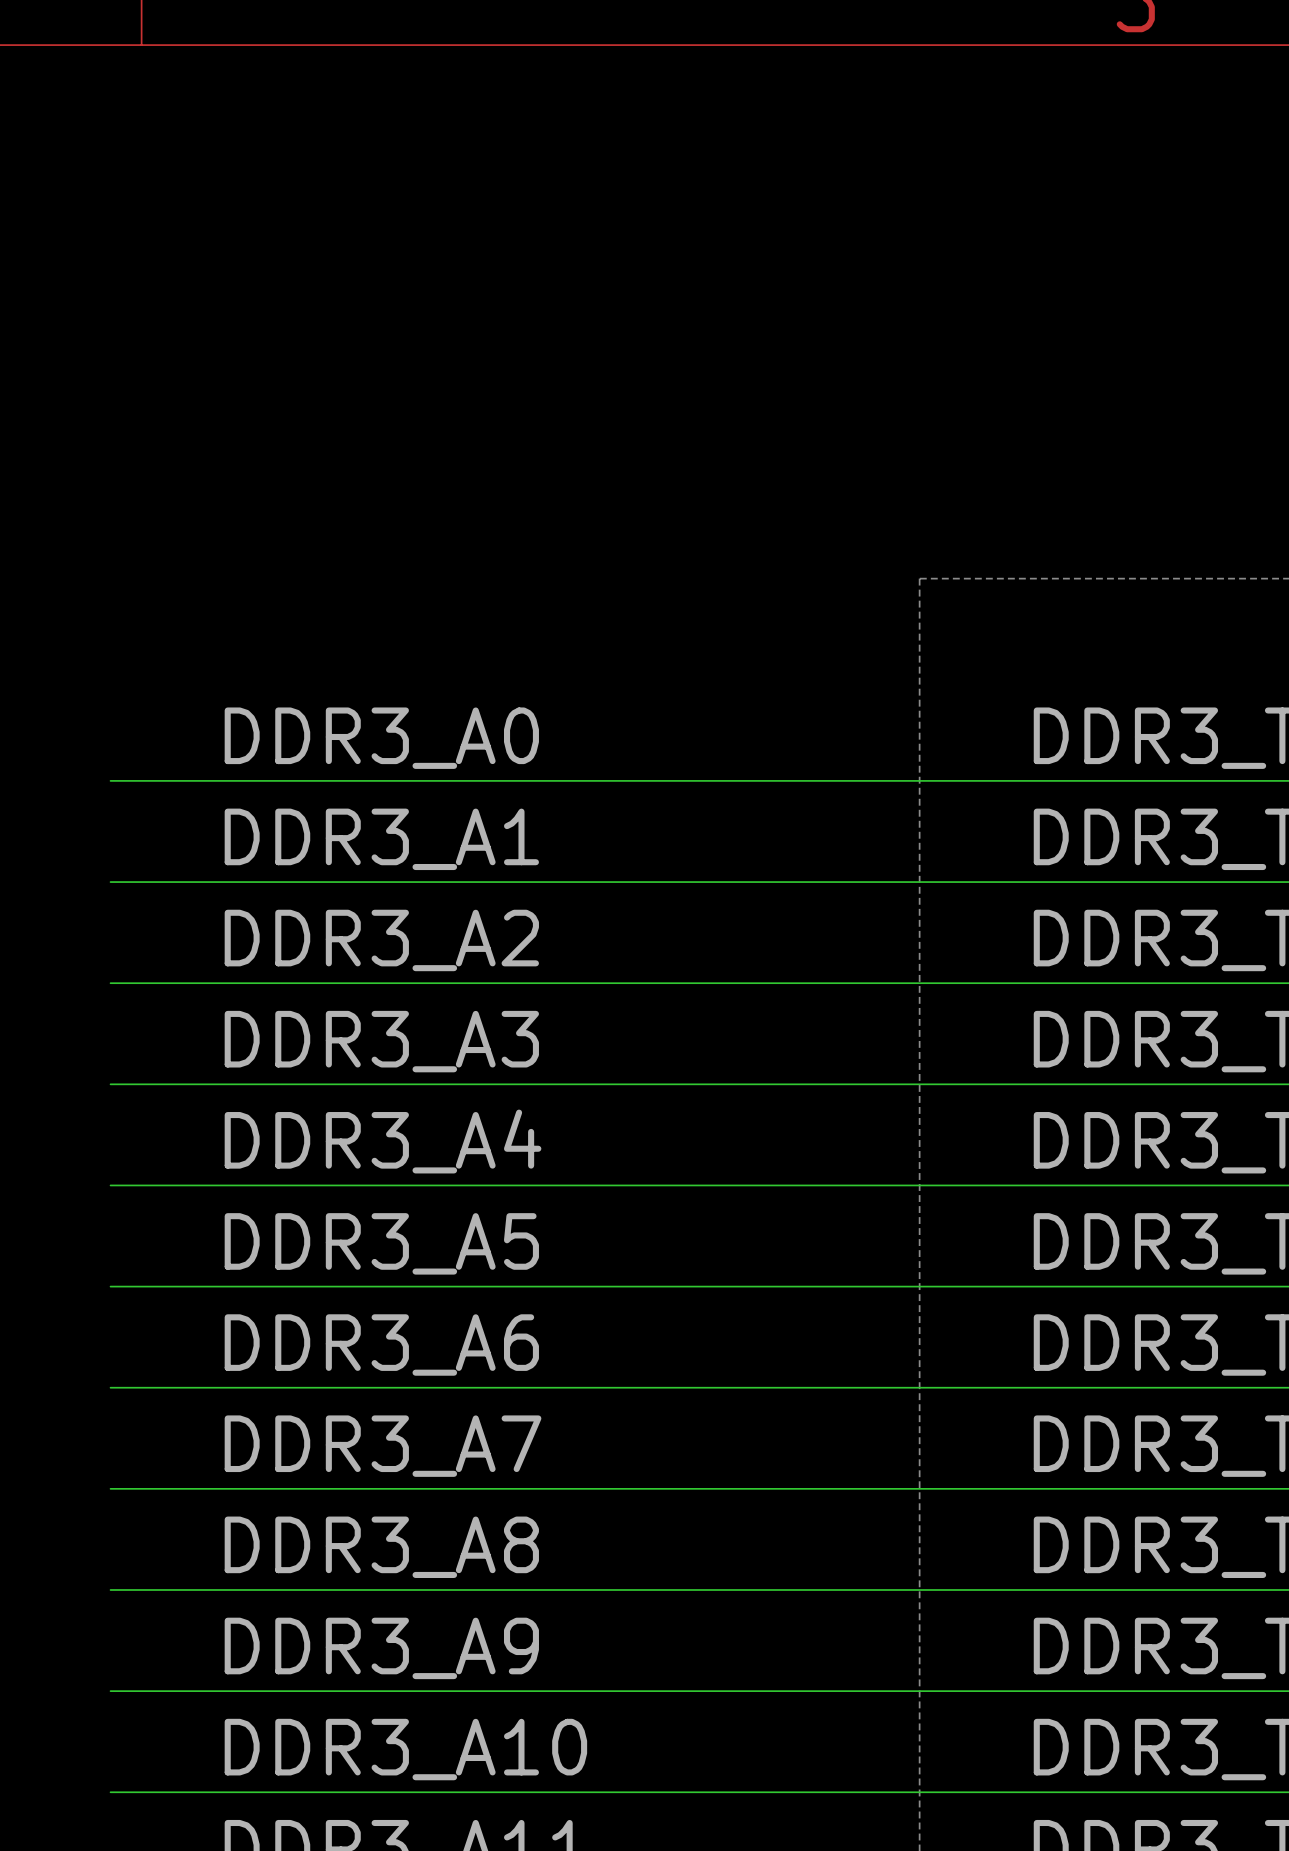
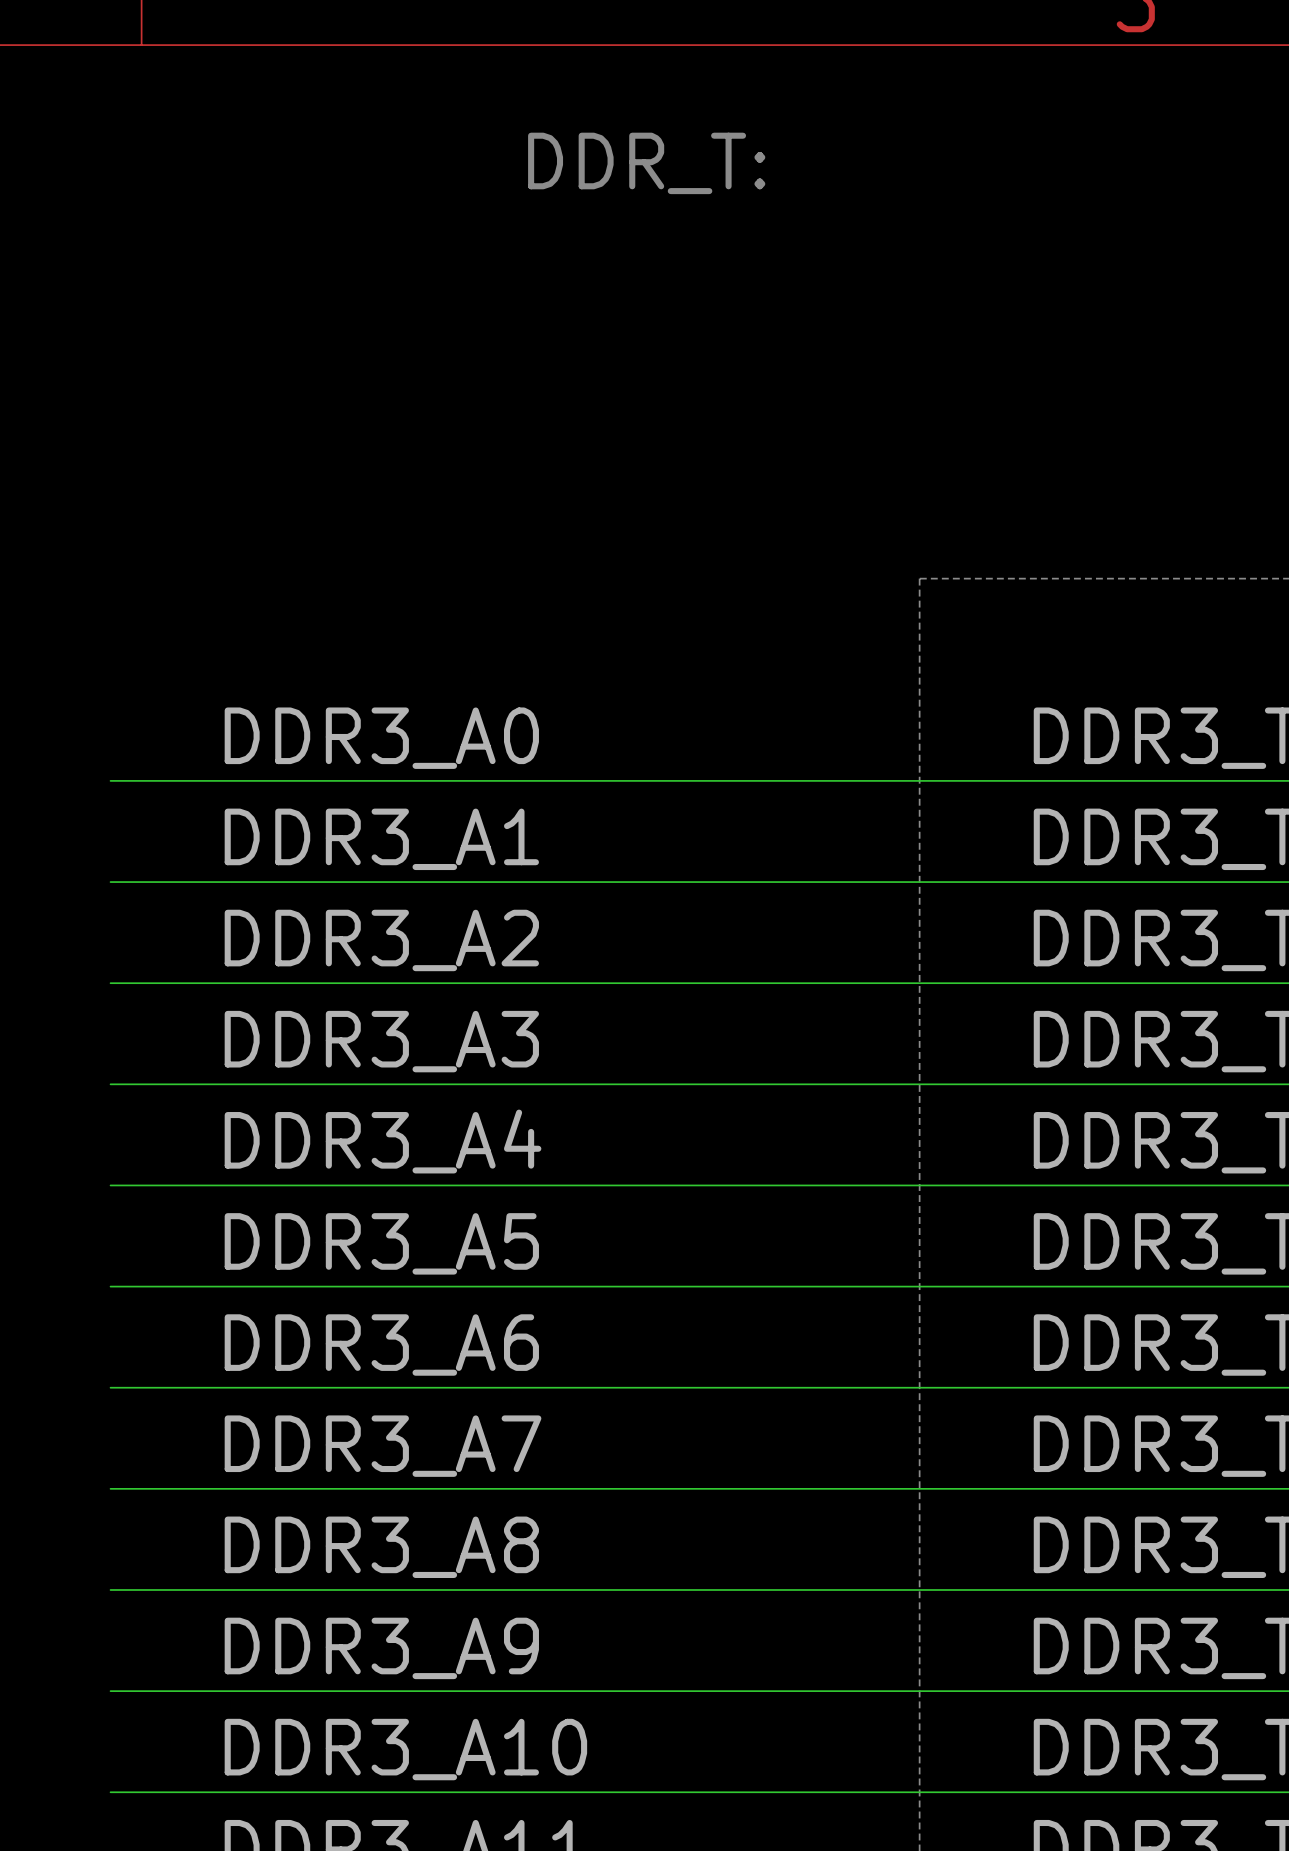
text: none -> DDR_T: (646, 163)

